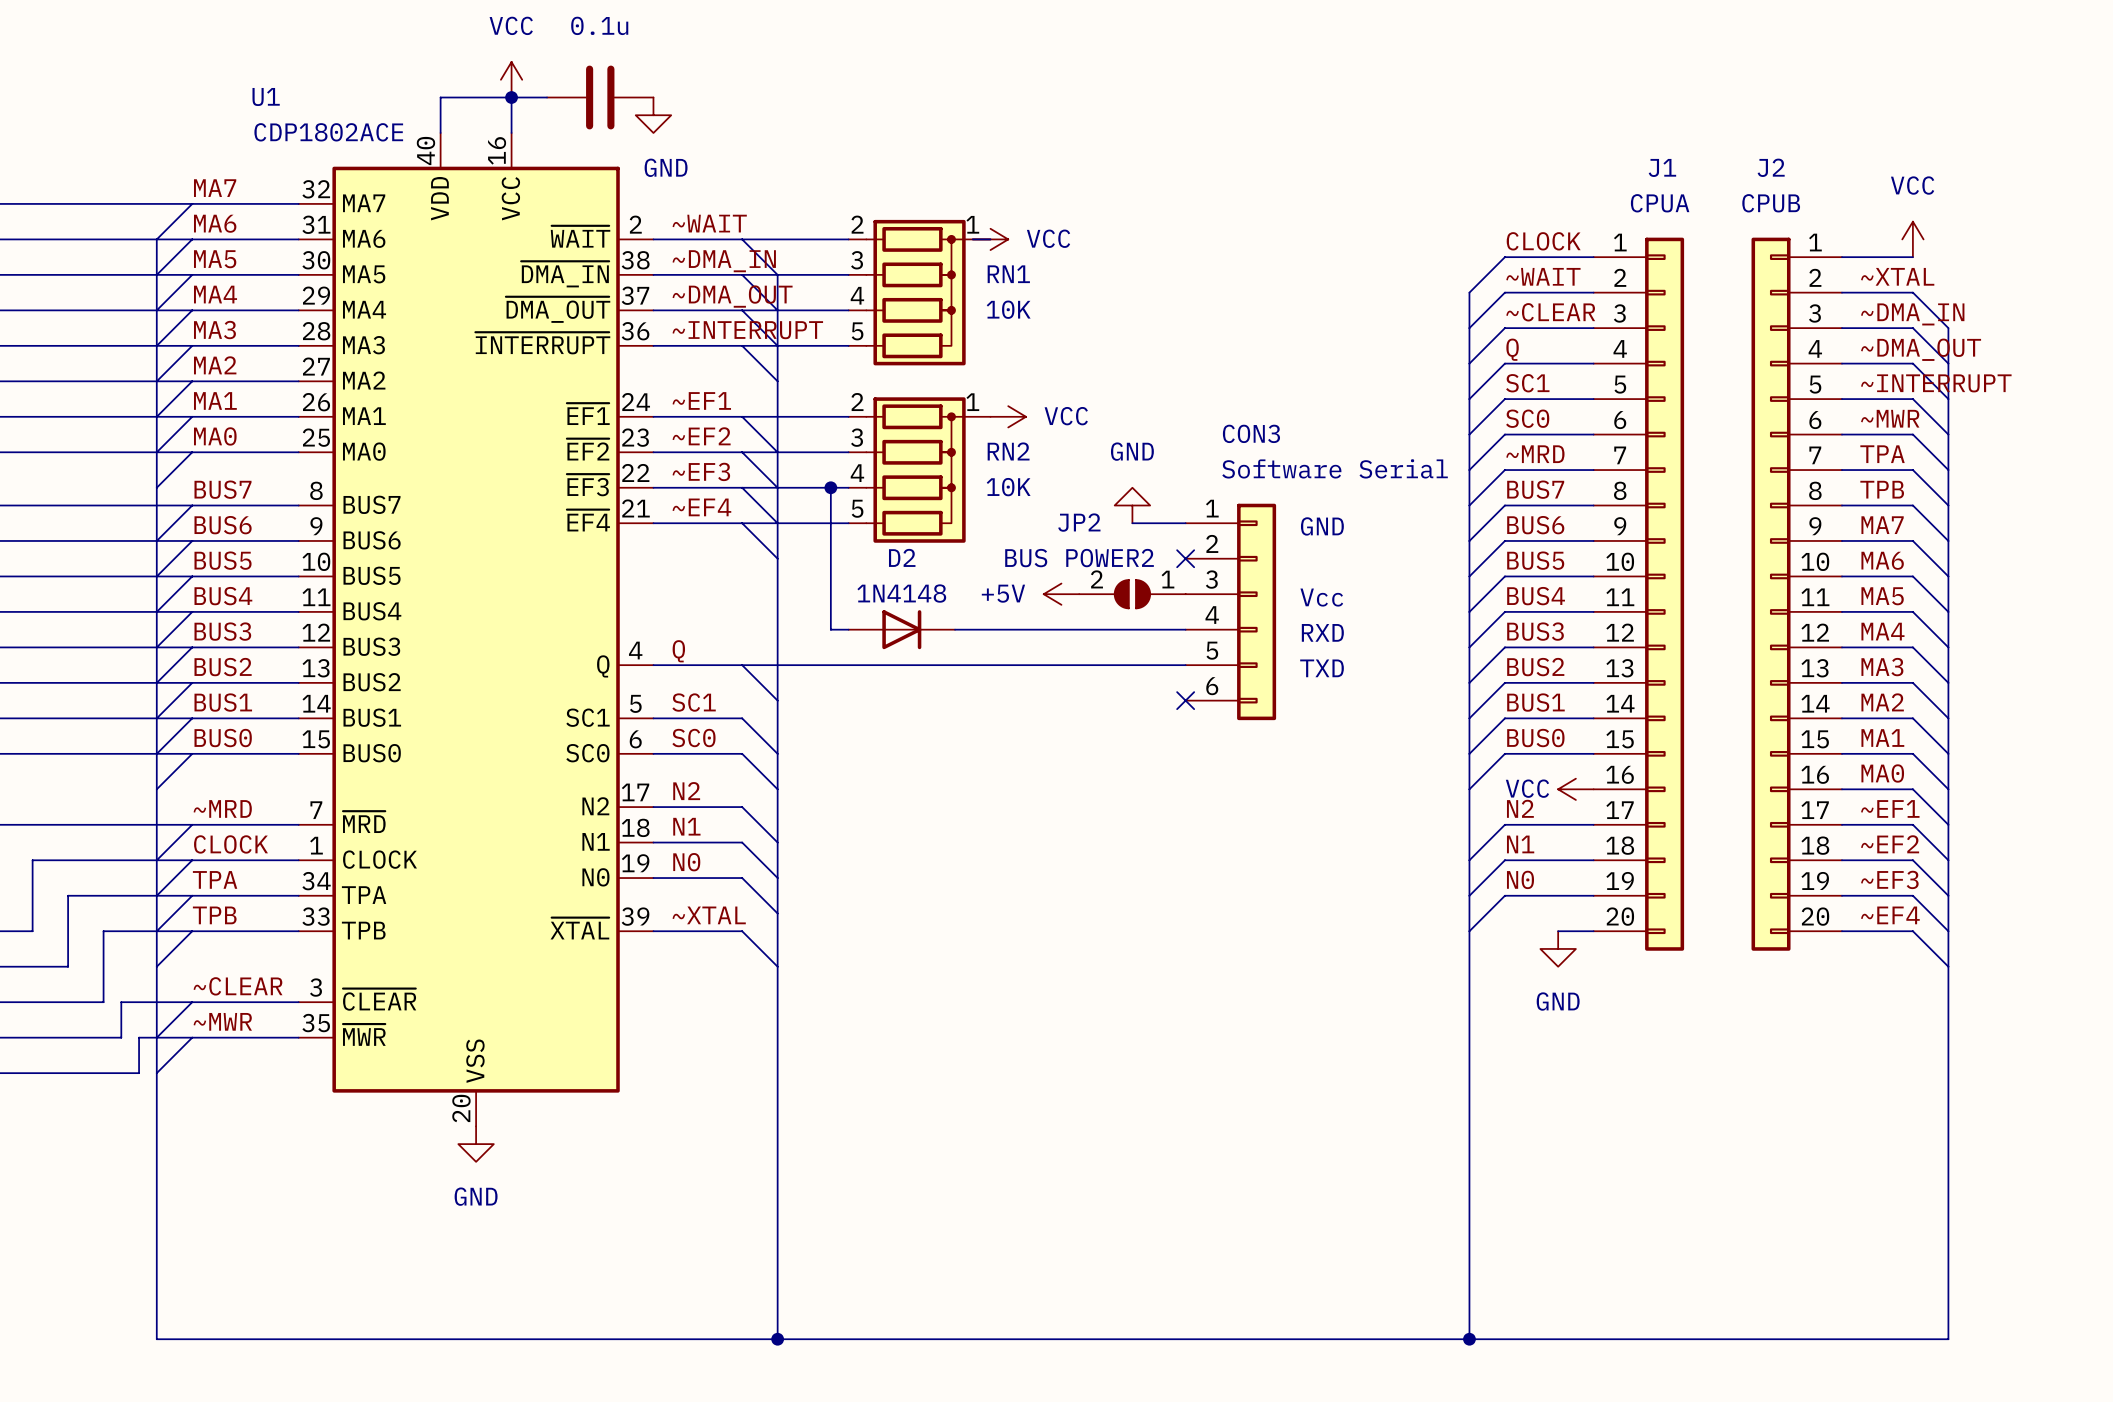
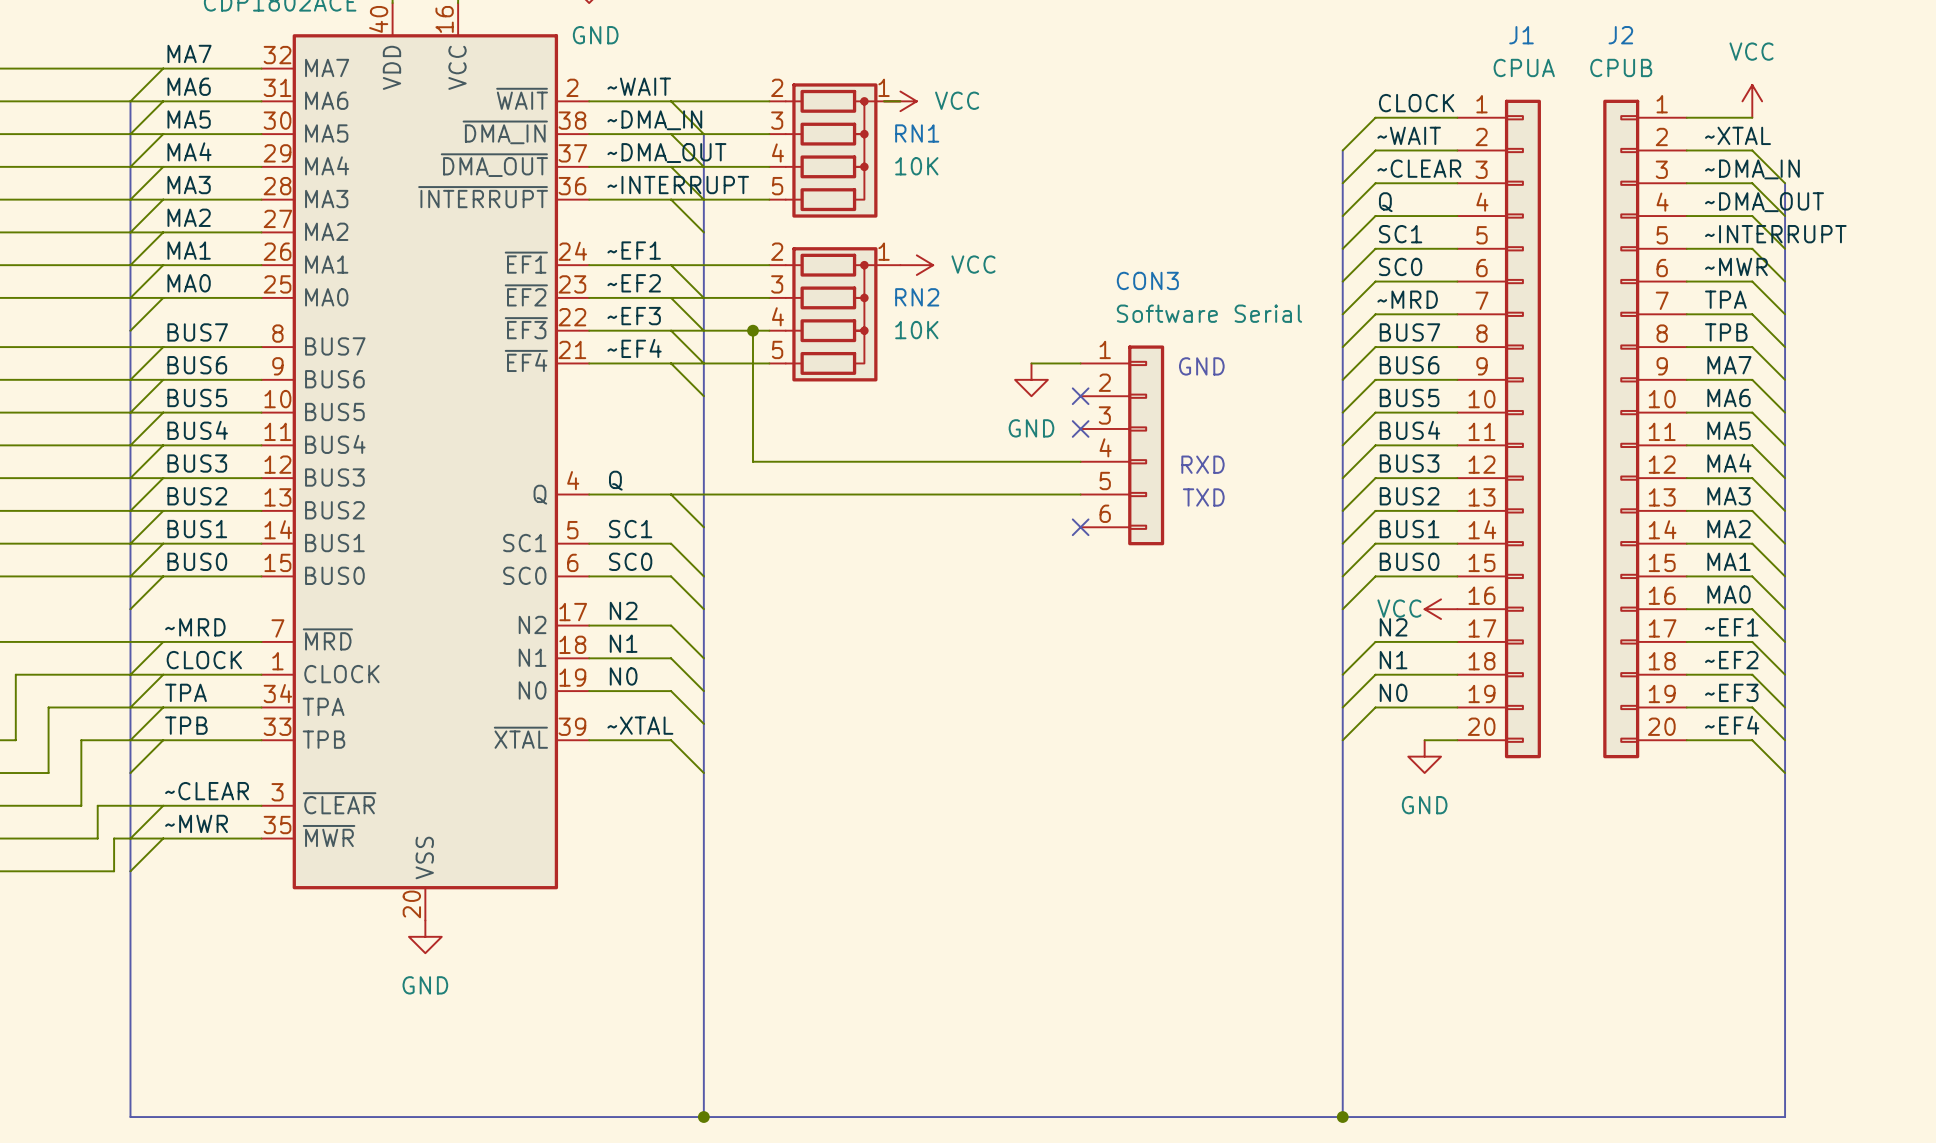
power symbol rotation: 0° (1132, 505) -> 180° (1031, 379)
power symbol position: GND (1132, 505) -> GND (1031, 379)
power symbol: +5V (1061, 594) -> none
JP2: BUS POWER2 (1132, 594) -> none
no-connect mark: none -> (1080, 428)
text: Vcc (1321, 597) -> none
D2: 1N4148 (901, 629) -> none

